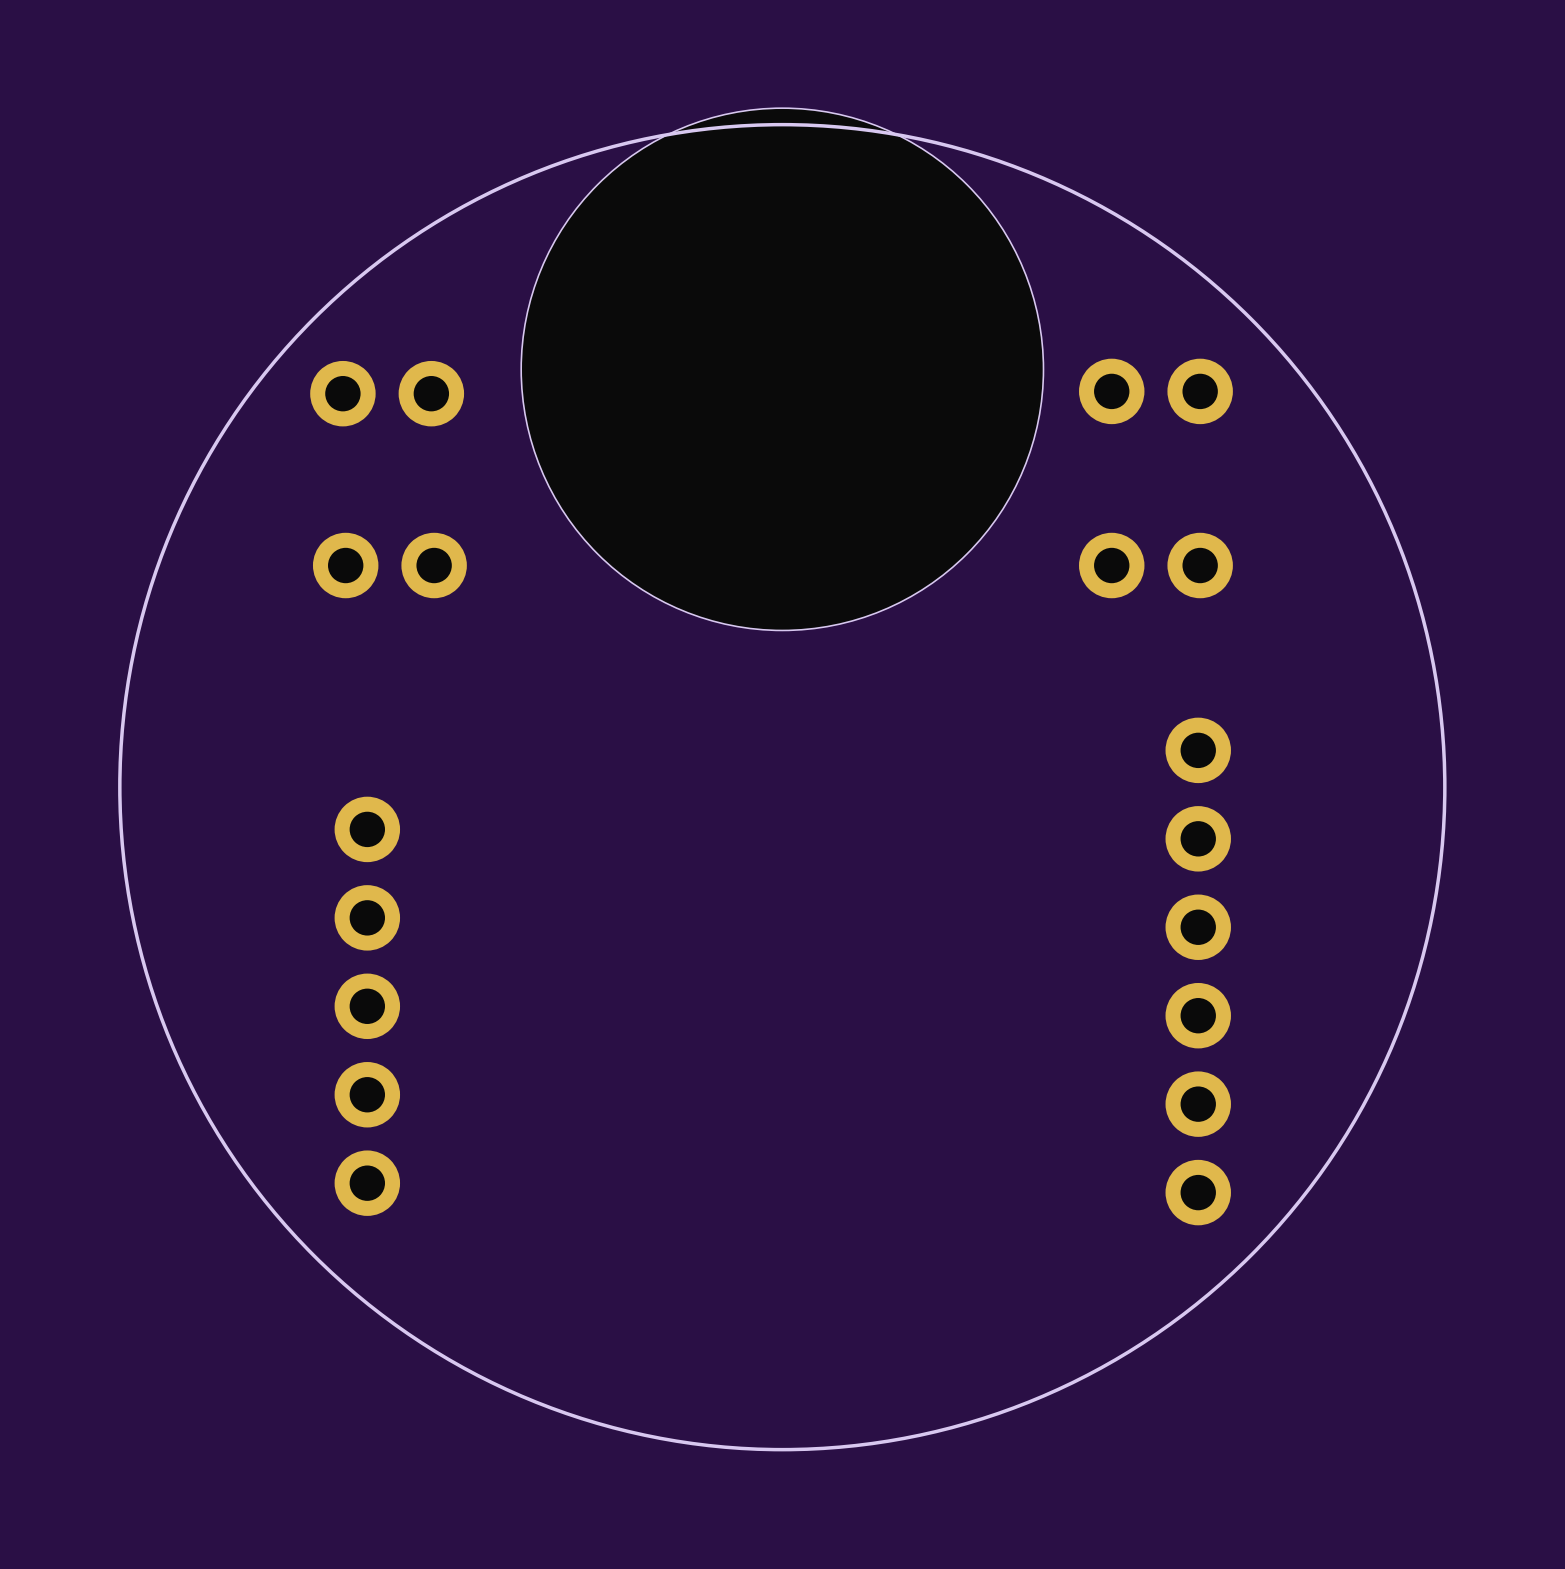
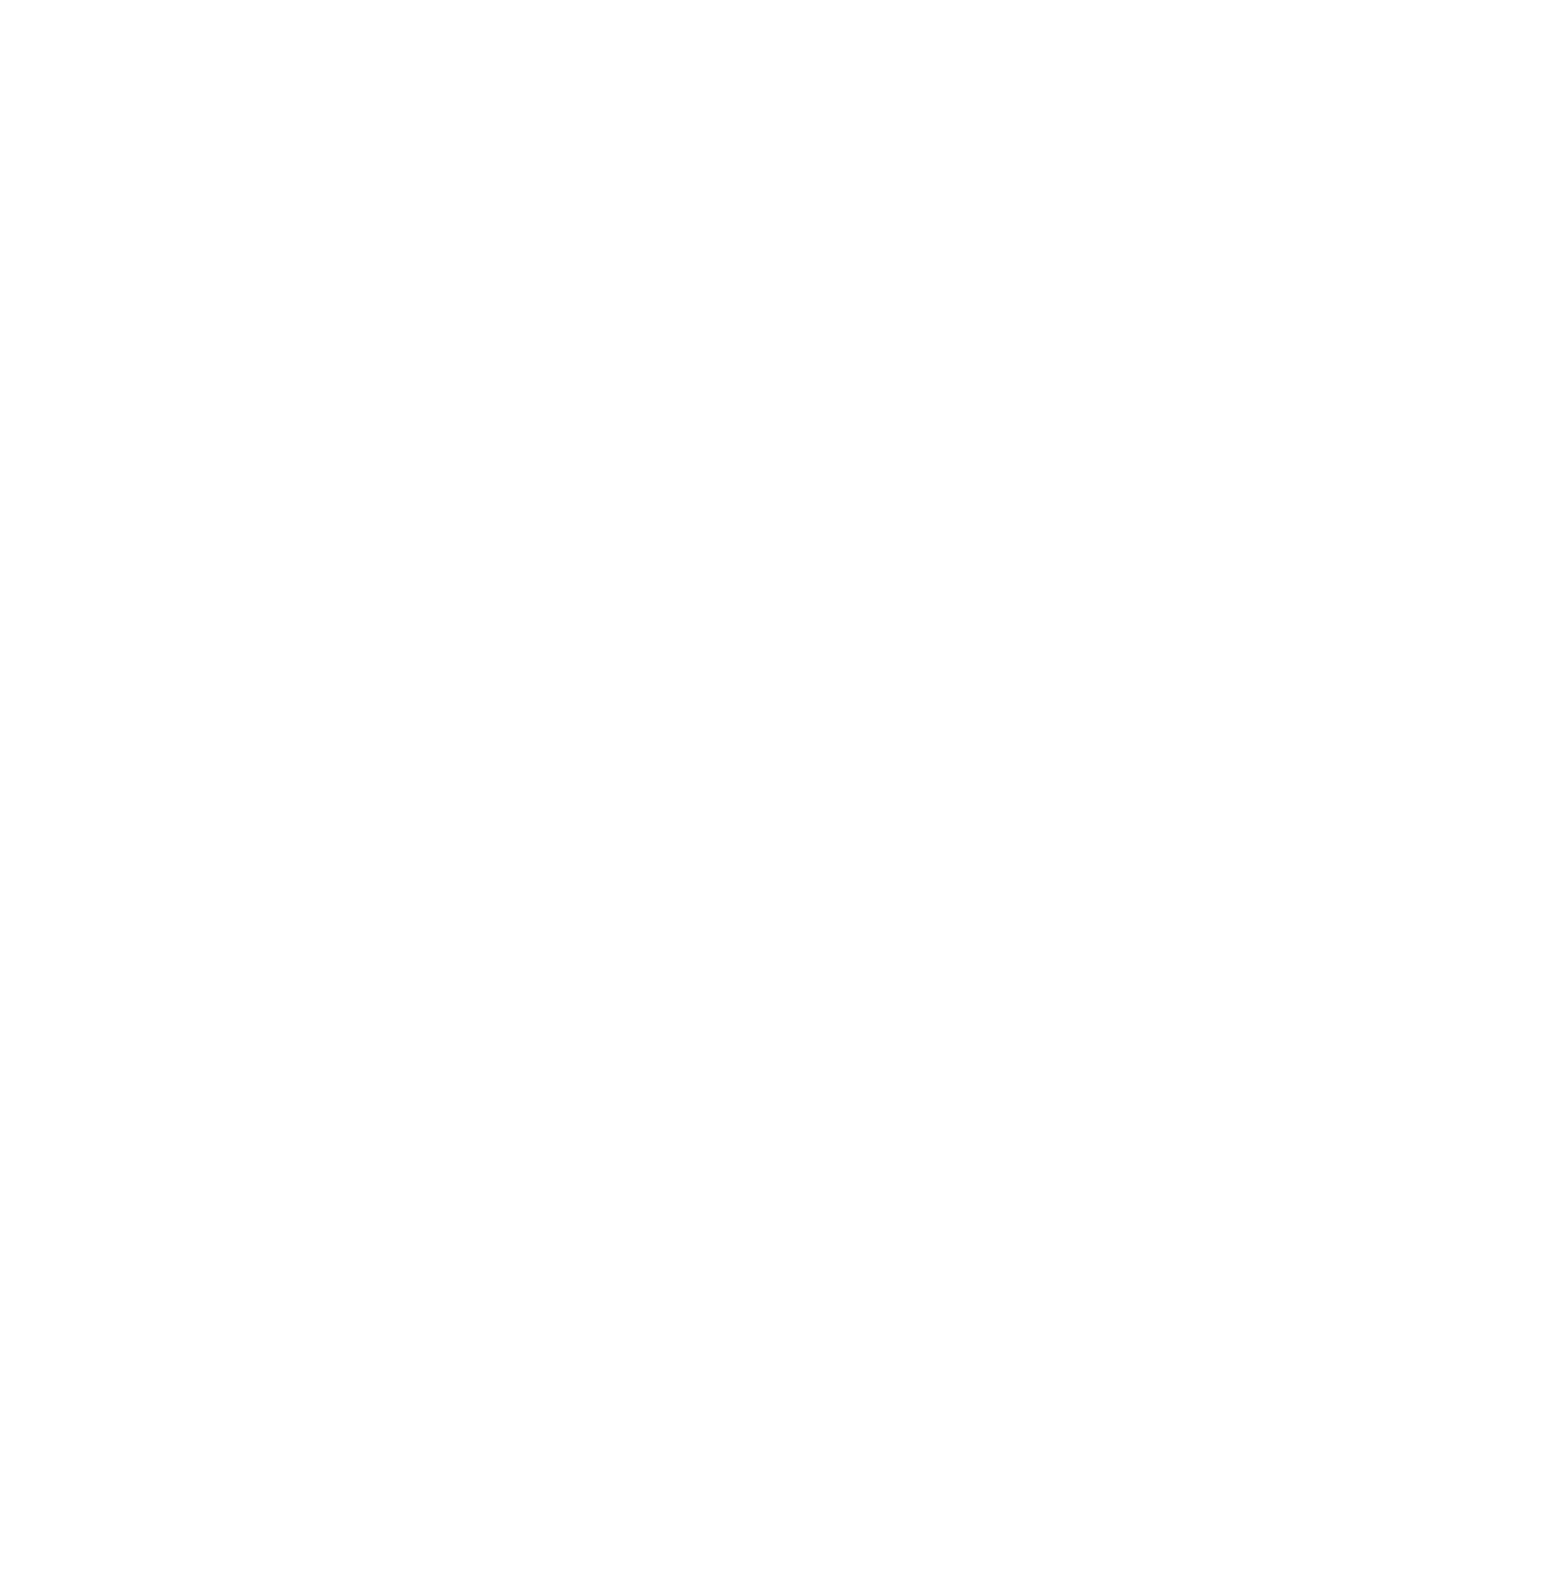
round board edge: [118, 122, 1447, 1452] -> none
hole: (782, 369) -> none
part: (1155, 391) -> none
part: (387, 393) -> none
part: (389, 565) -> none
part: (1155, 565) -> none
part: (1198, 971) -> none
part: (367, 1006) -> none

